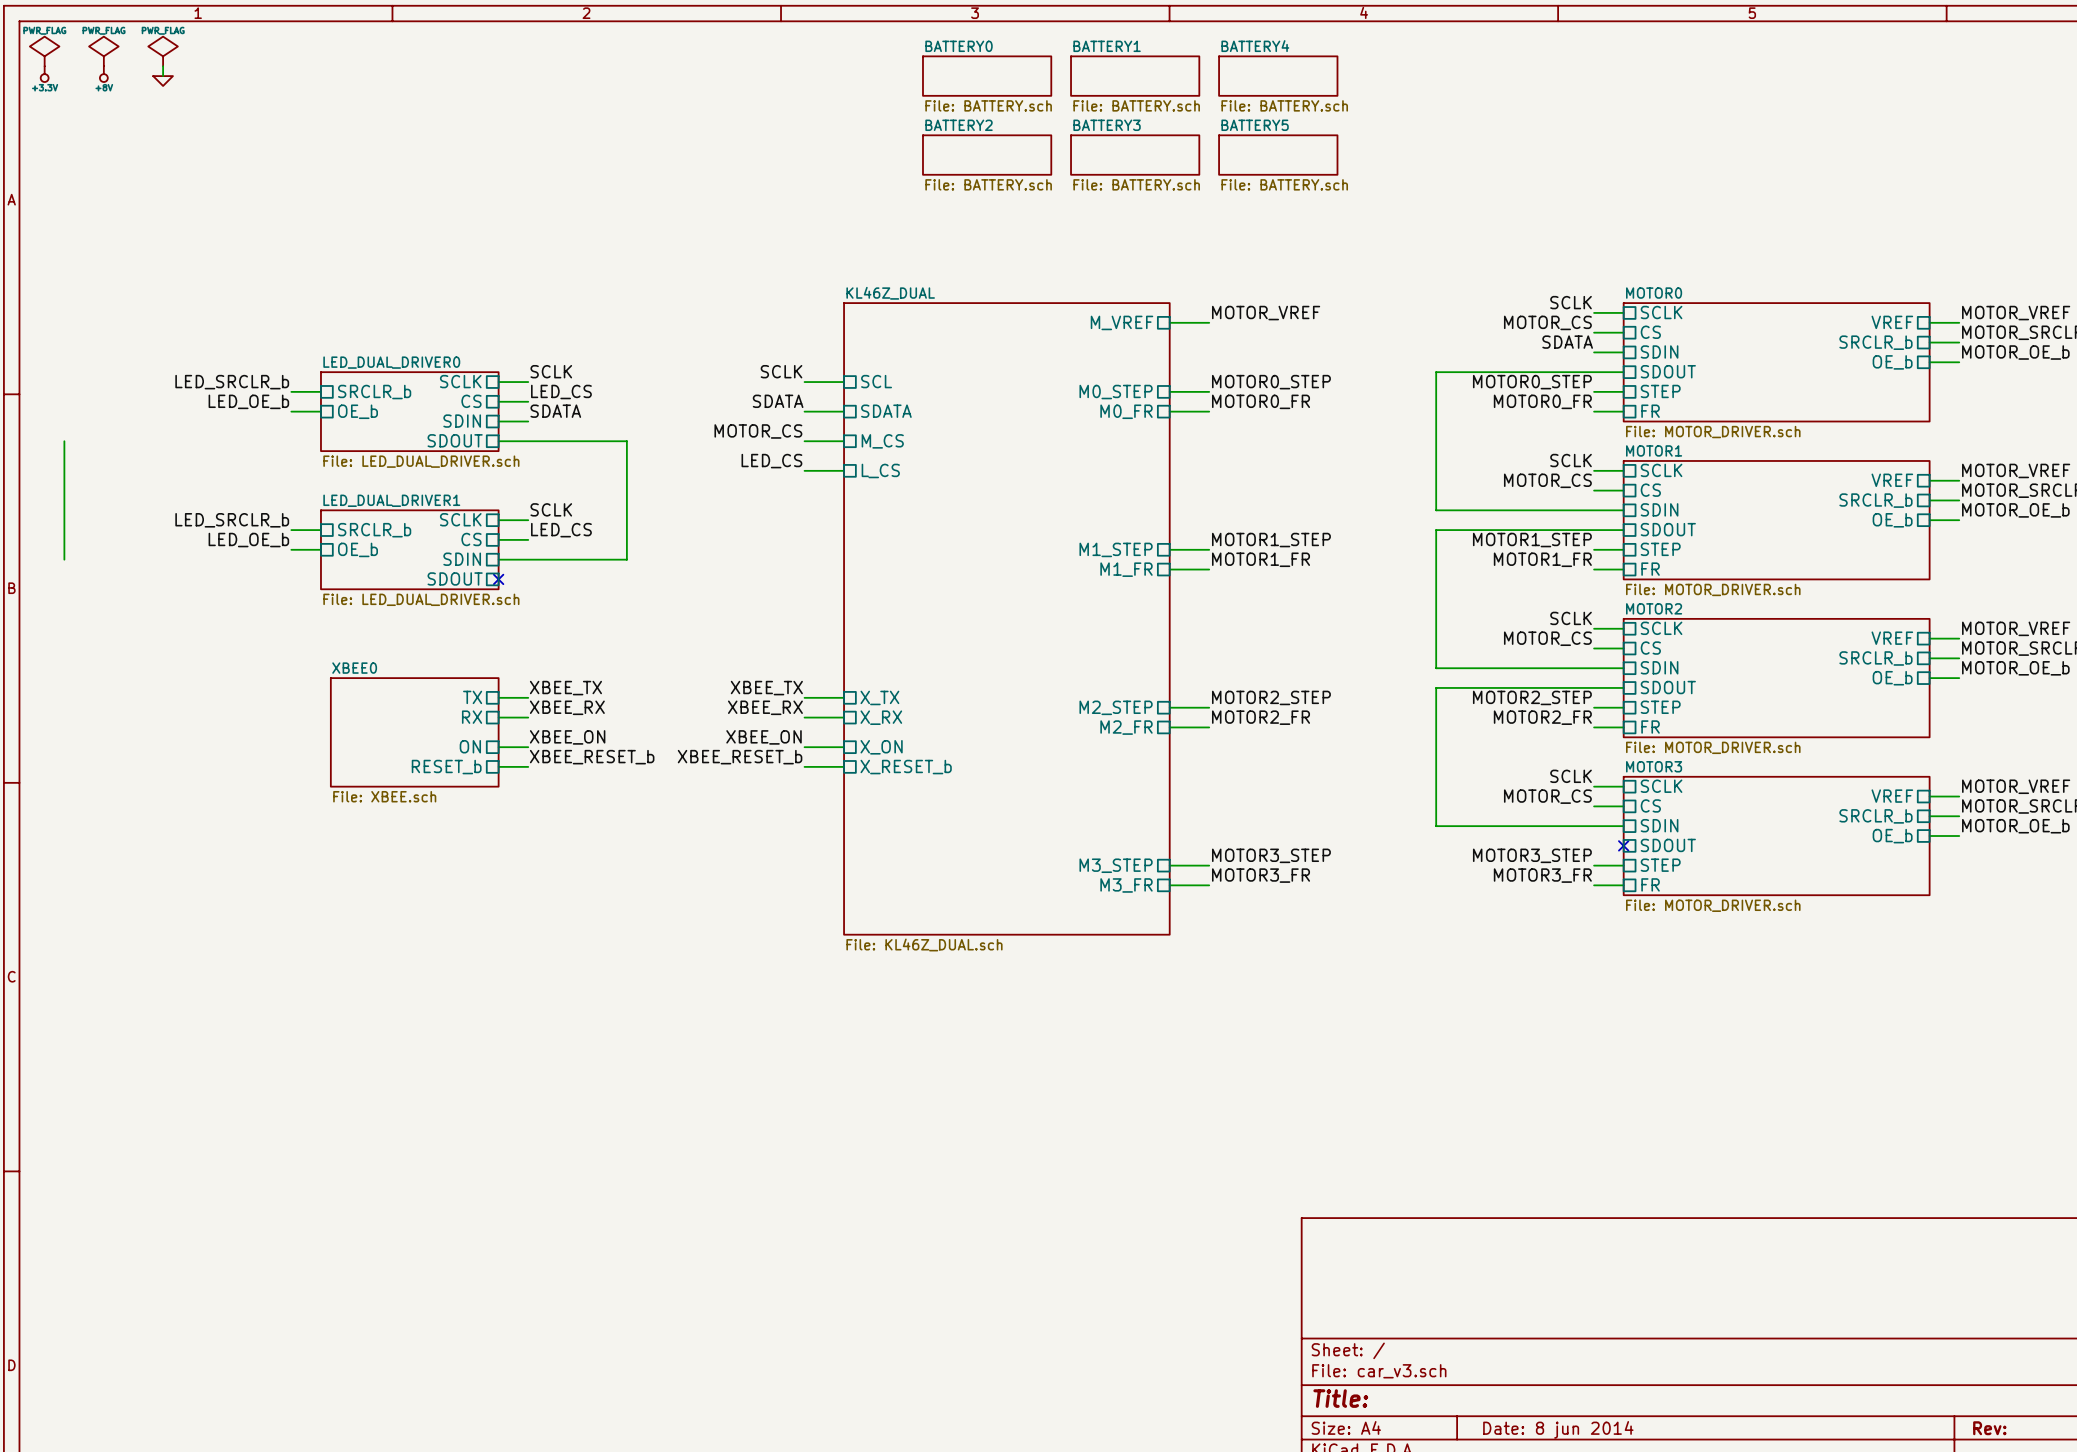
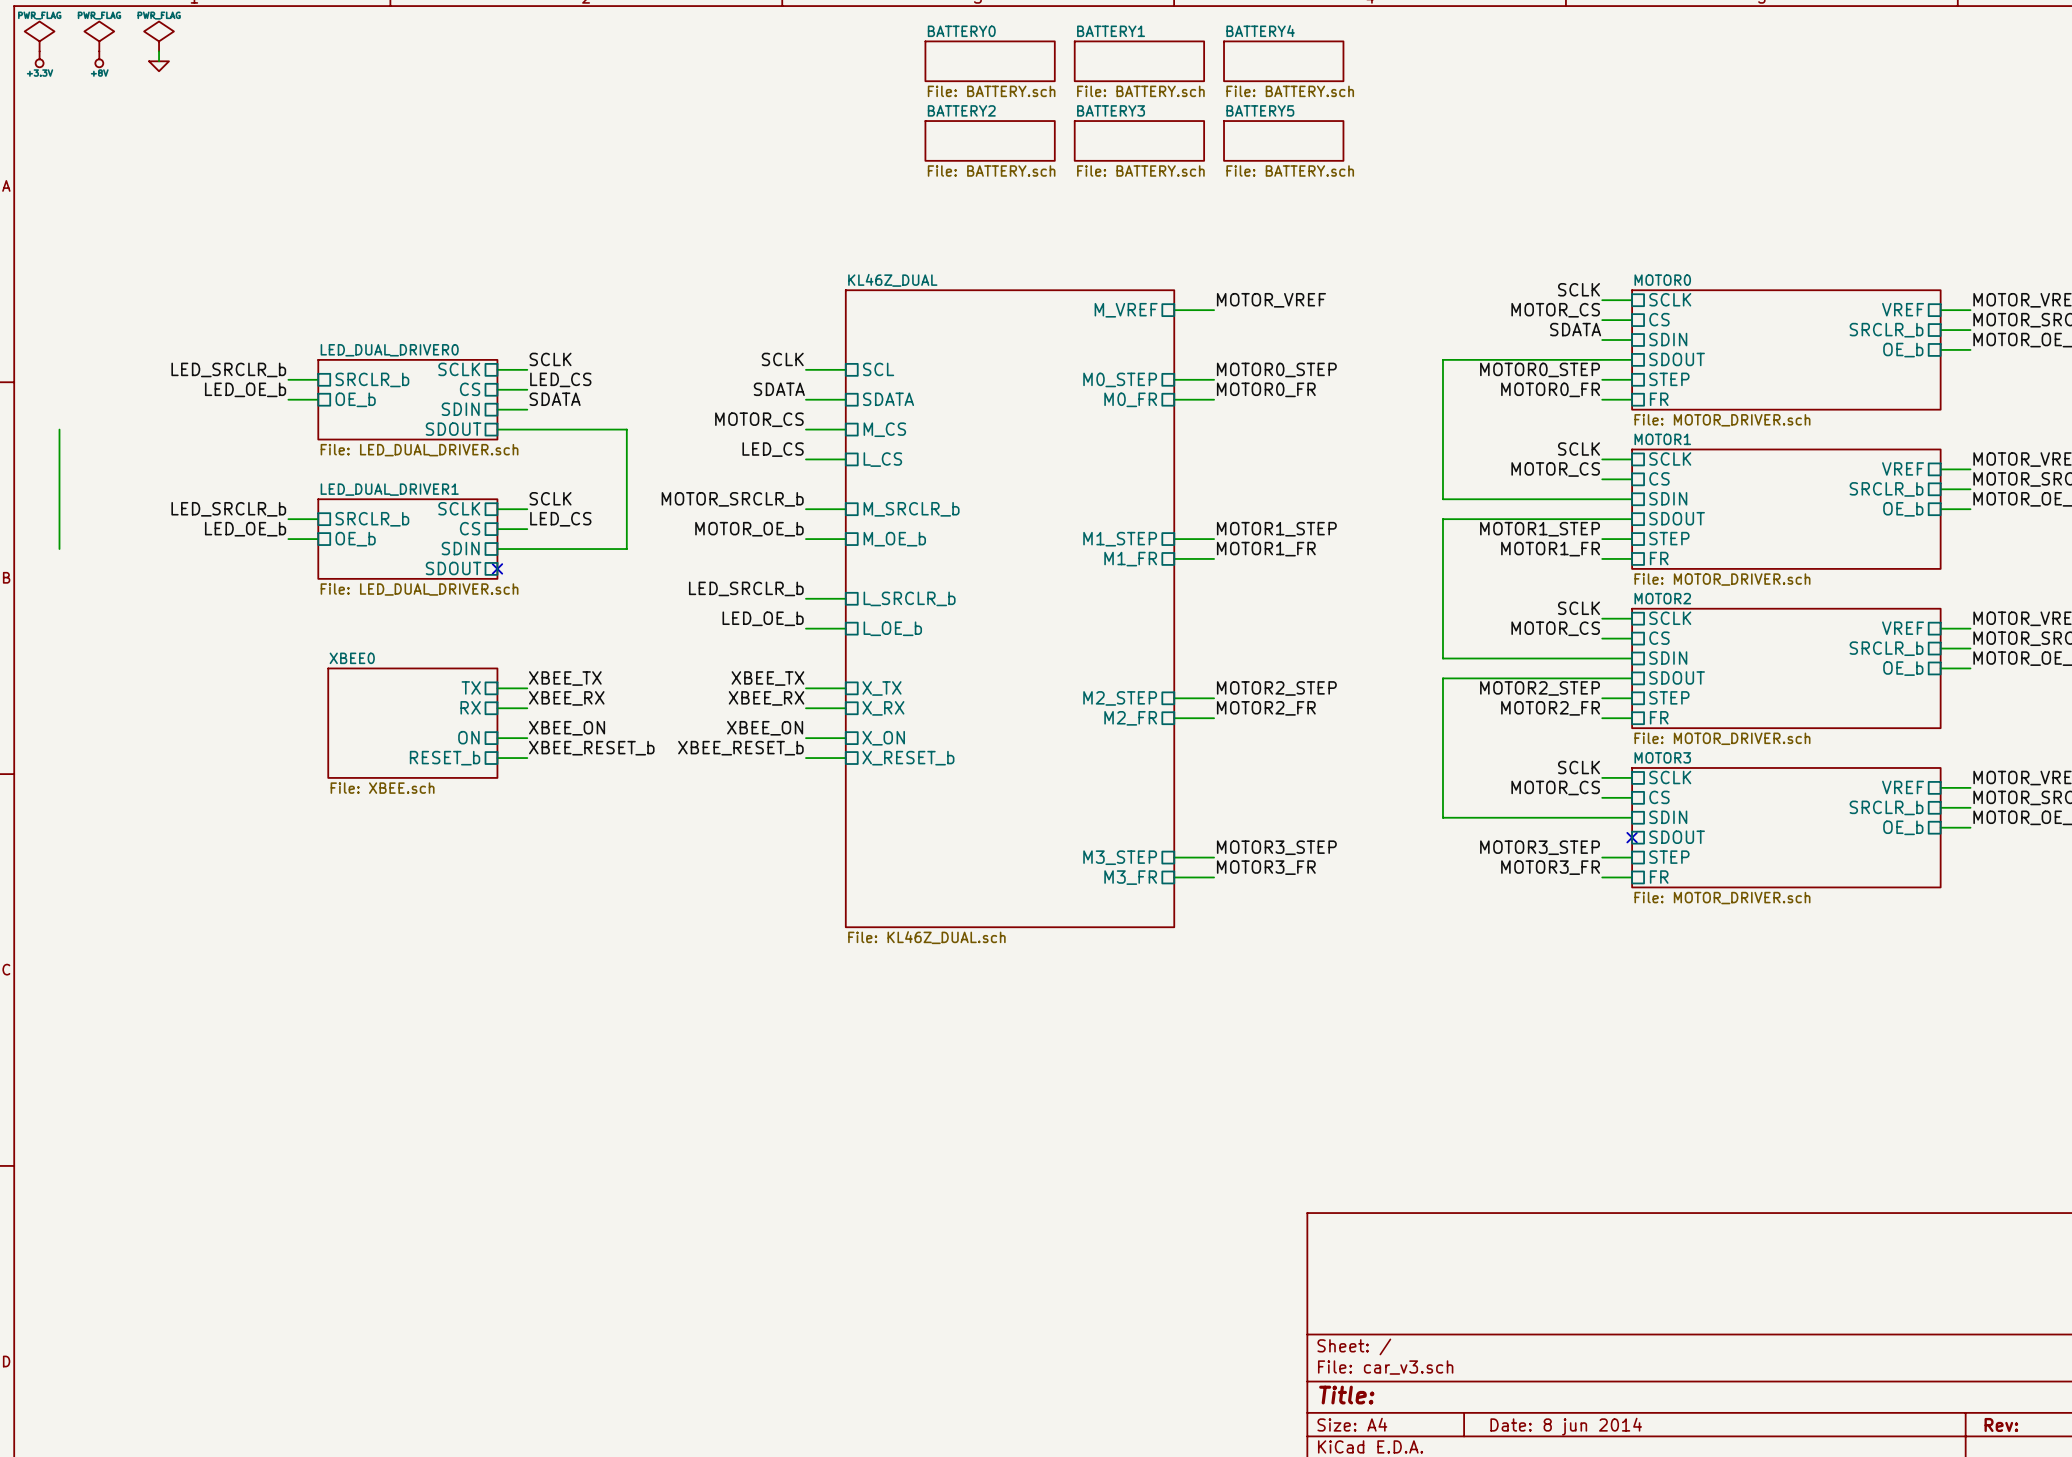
label: none -> MOTOR_SRCLR_b (732, 499)
wire: none -> (805, 509) (845, 509)
sheet pin: none -> M_SRCLR_b (911, 509)
label: none -> MOTOR_OE_b (749, 529)
wire: none -> (805, 539) (845, 539)
sheet pin: none -> M_OE_b (894, 539)
label: none -> LED_SRCLR_b (746, 588)
wire: none -> (805, 598) (845, 598)
sheet pin: none -> L_SRCLR_b (909, 598)
label: none -> LED_OE_b (763, 618)
wire: none -> (805, 628) (845, 628)
sheet pin: none -> L_OE_b (892, 628)

